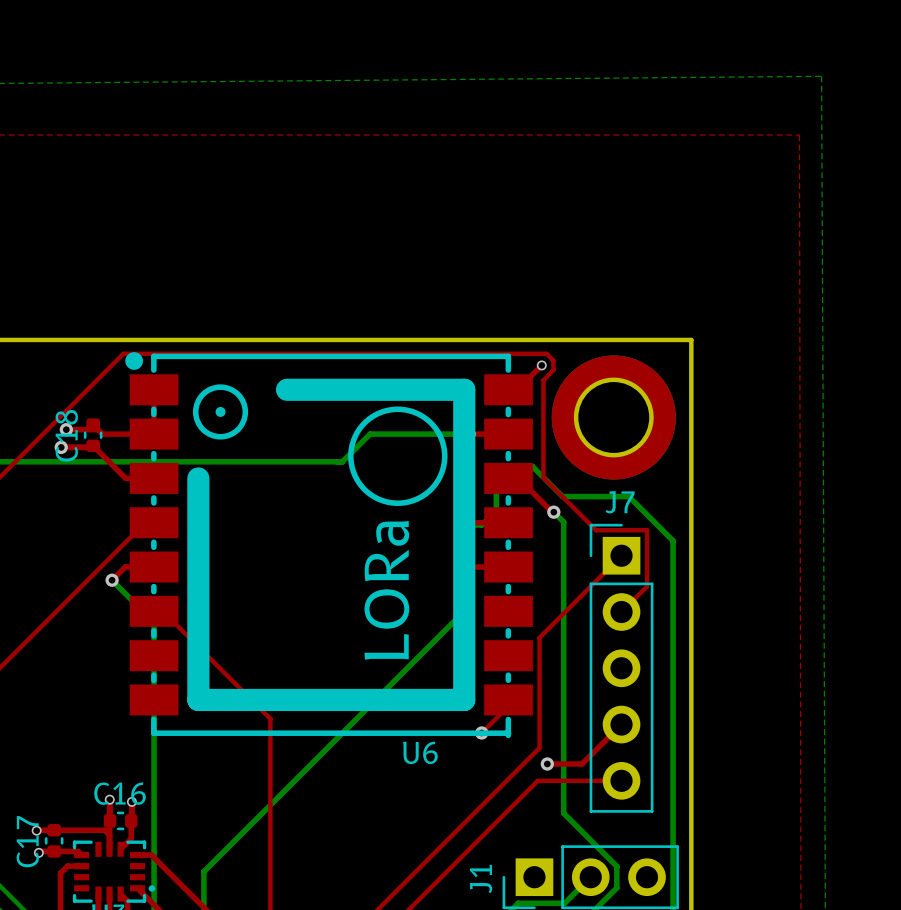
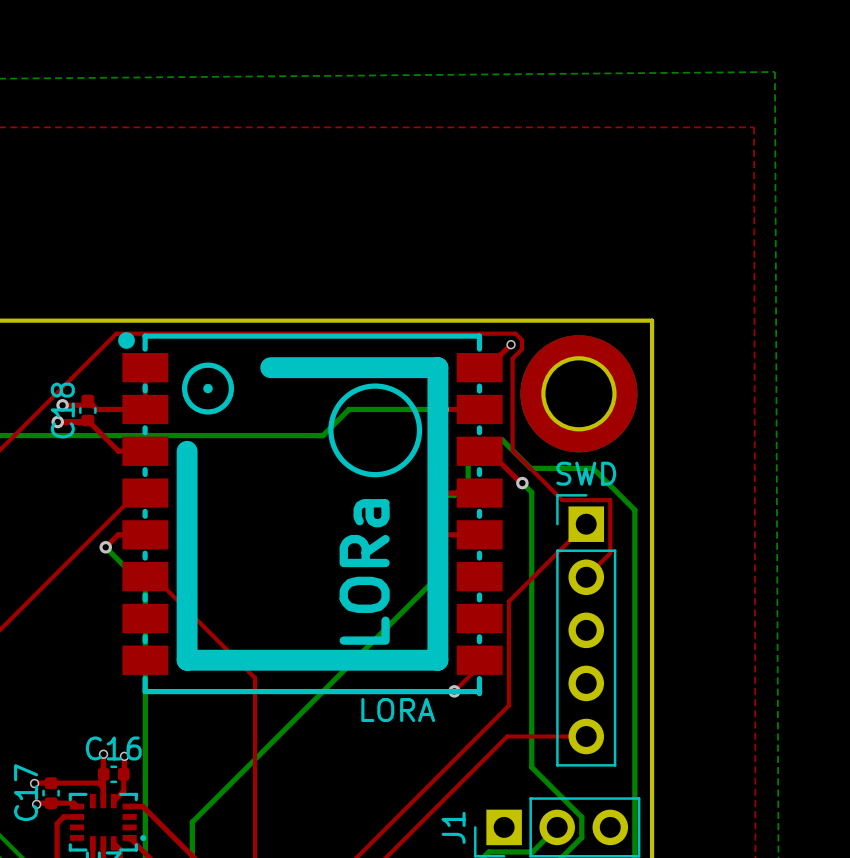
J7 name: J7 (620, 502) -> SWD (586, 473)
top track: (621, 724) (582, 763) (547, 763) -> none
U6 name: U6 (420, 752) -> LORA (398, 710)
via: (547, 763) -> none

